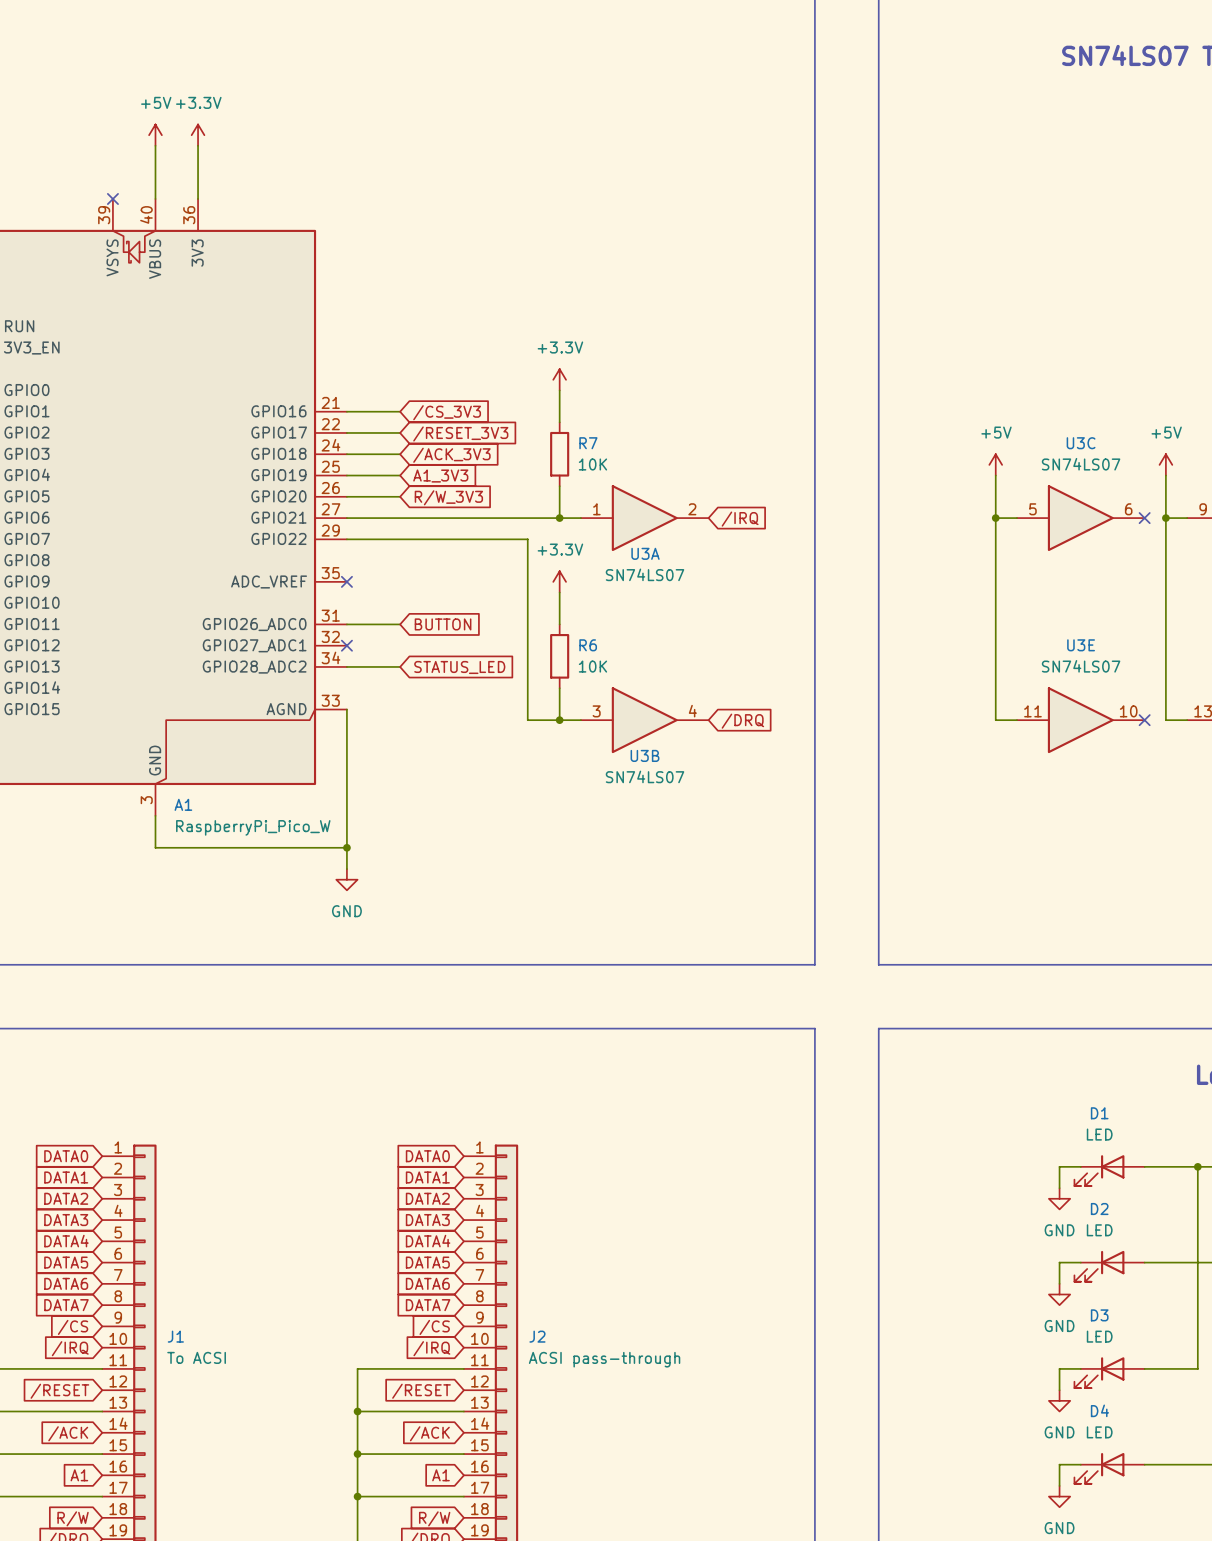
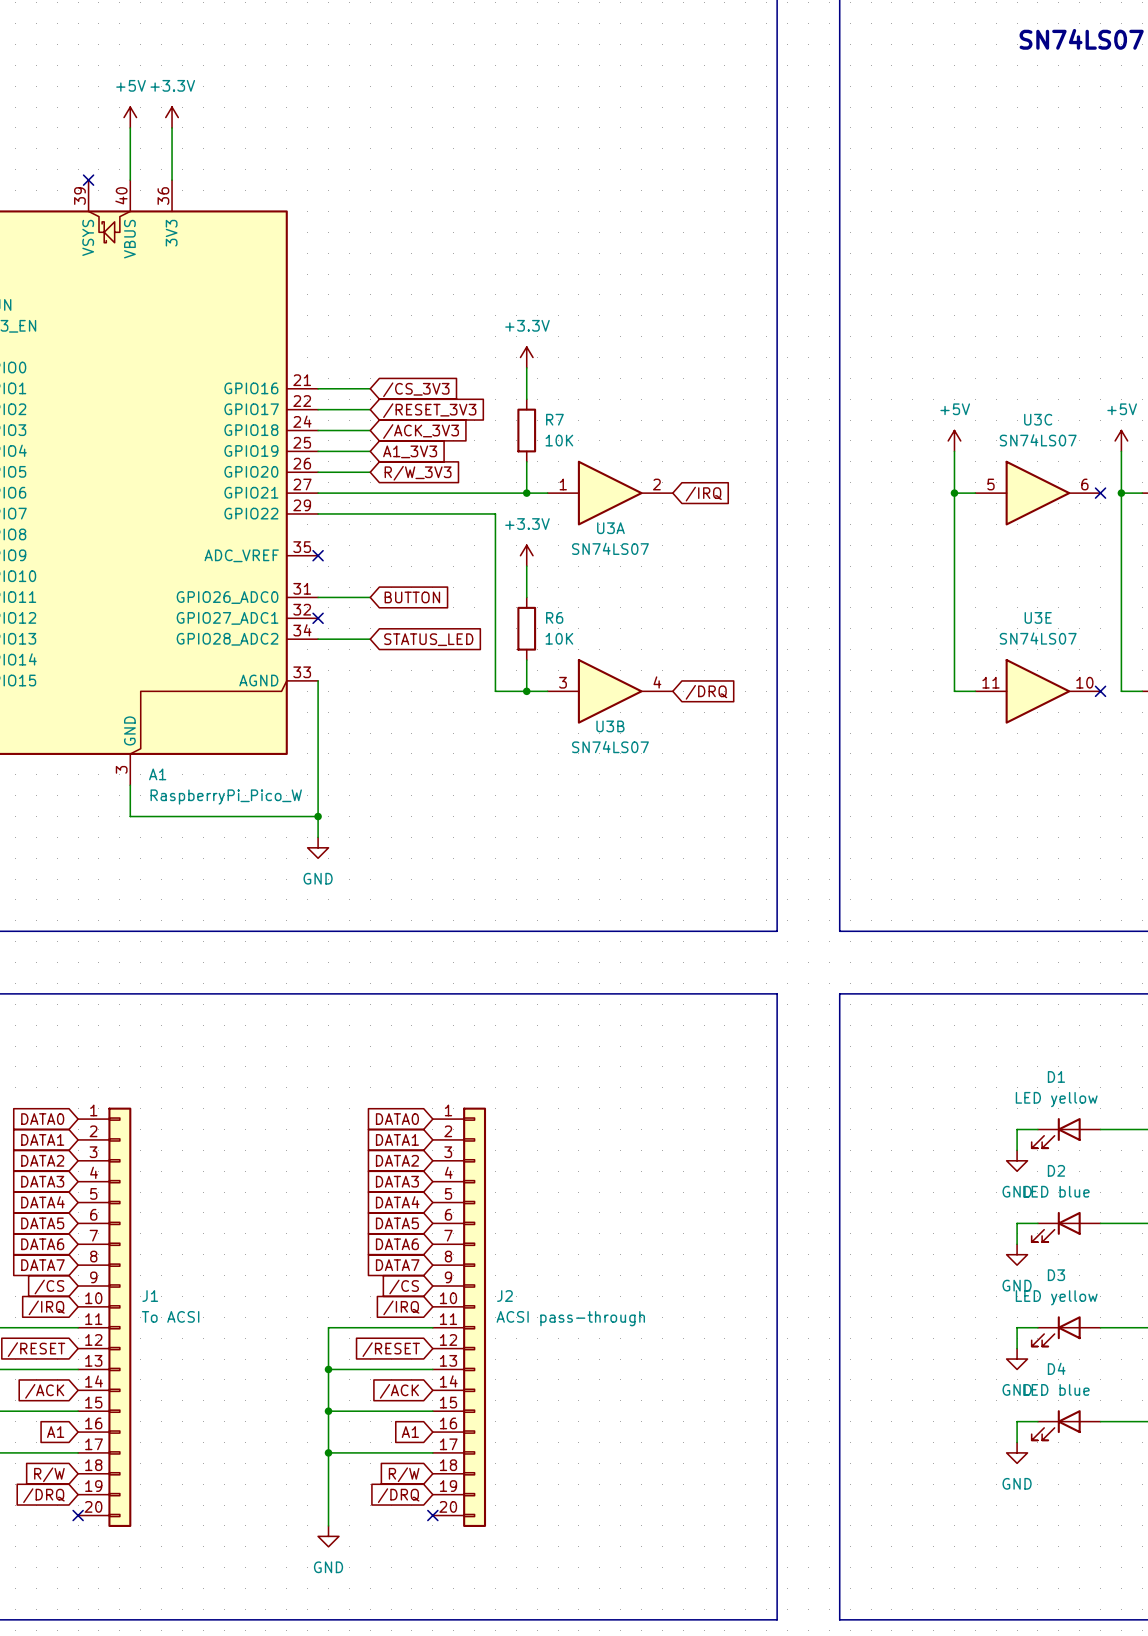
D1 value: LED (1099, 1134) -> LED yellow (1056, 1099)
D2 value: LED (1099, 1230) -> LED blue (1056, 1191)
D3 value: LED (1099, 1336) -> LED yellow (1056, 1297)
D4 value: LED (1099, 1432) -> LED blue (1056, 1389)

